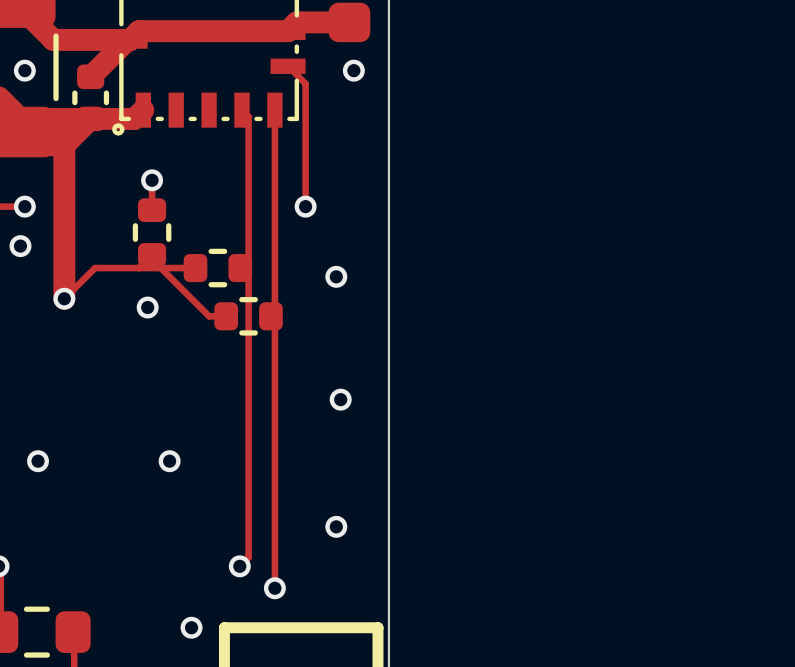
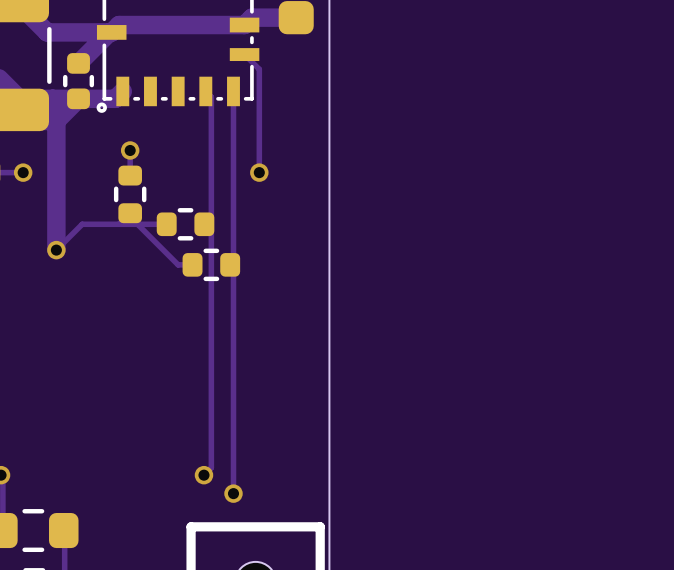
via: (24, 70) -> none
via: (353, 70) -> none
via: (20, 246) -> none
via: (336, 276) -> none
via: (147, 307) -> none
via: (340, 399) -> none
via: (38, 461) -> none
via: (169, 461) -> none
via: (336, 526) -> none
via: (191, 627) -> none

